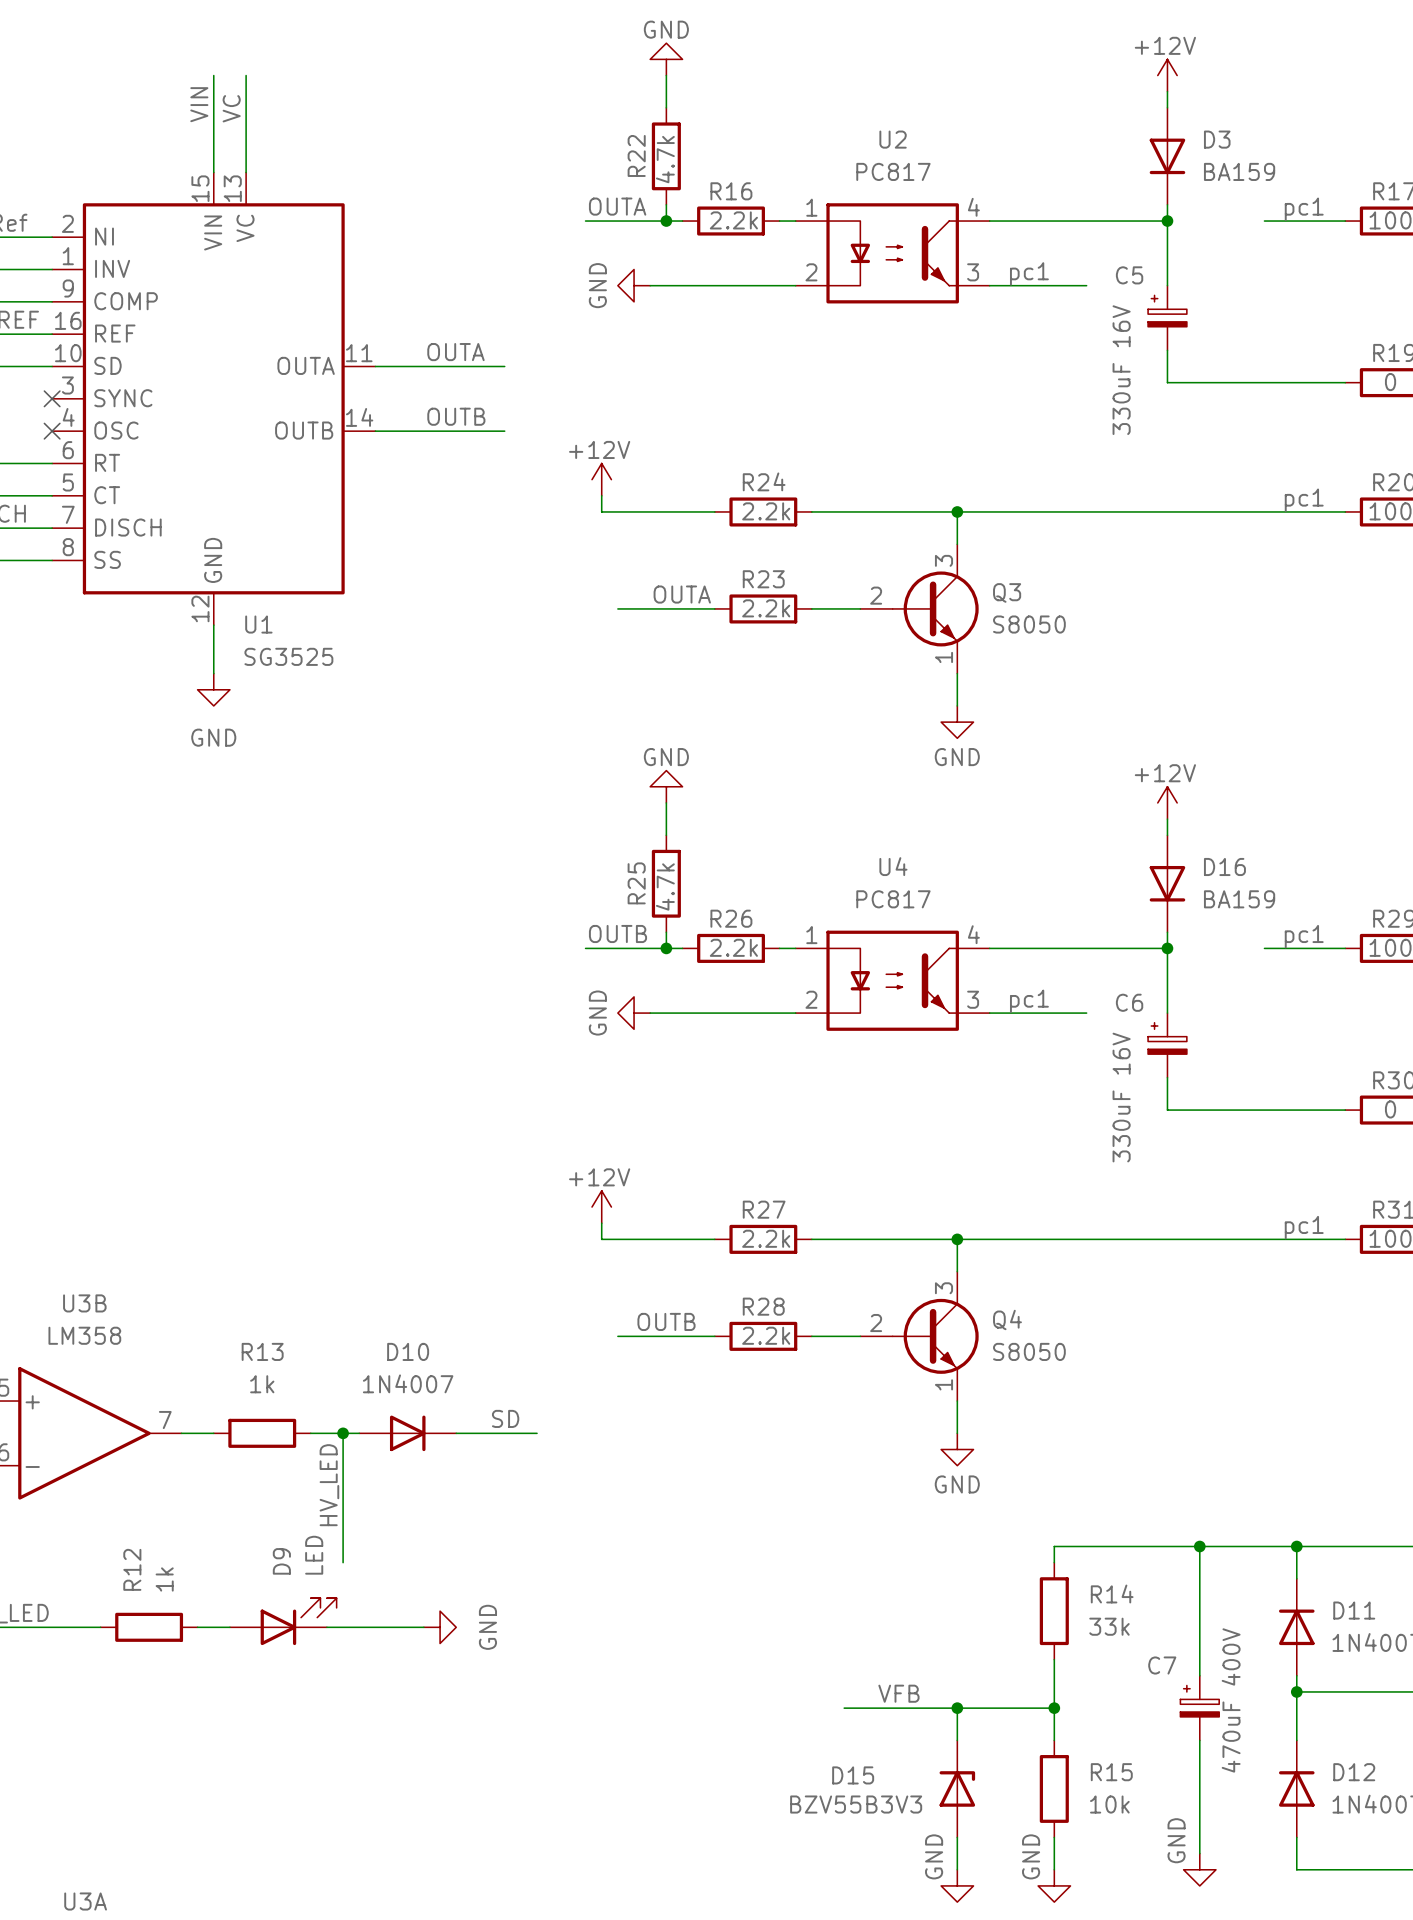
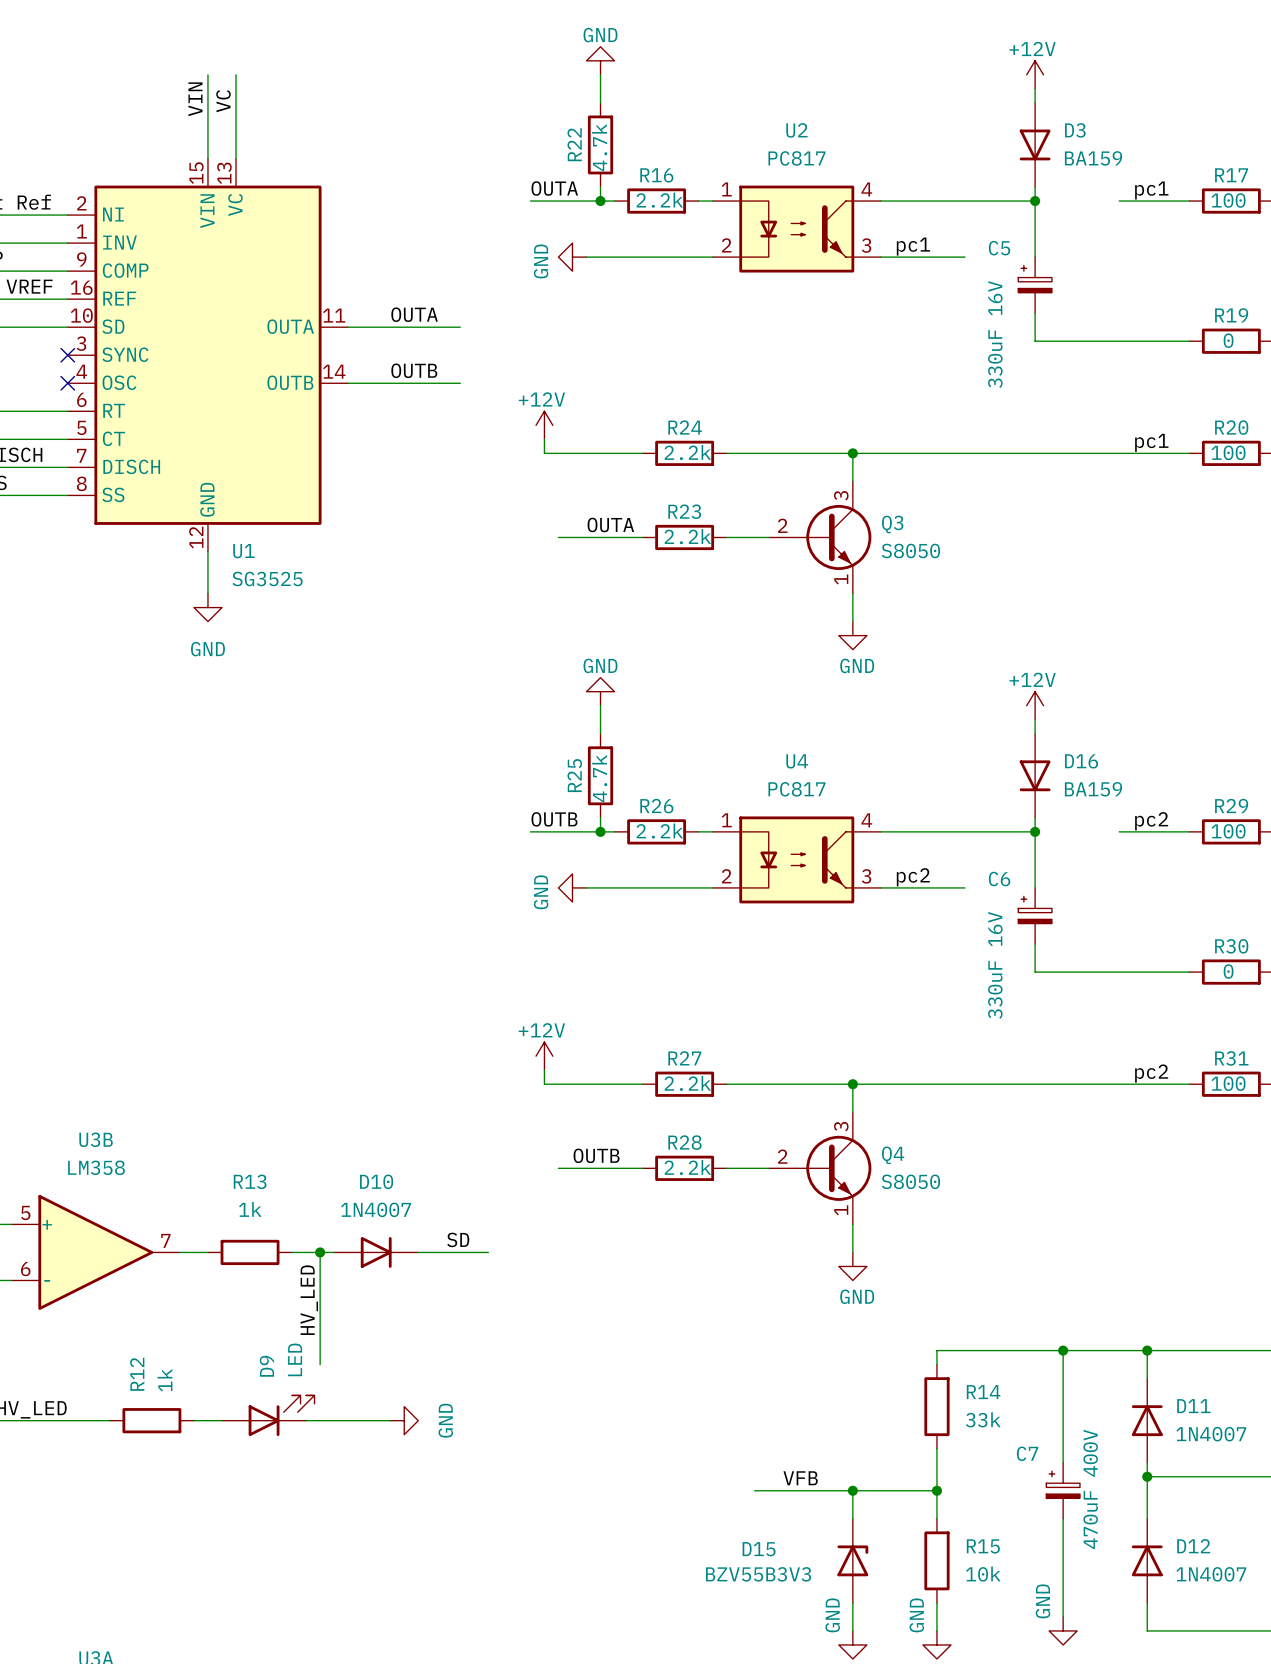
label: pc1 (1304, 936) -> pc2 (1151, 821)
label: pc1 (1029, 1001) -> pc2 (913, 877)
label: pc1 (1304, 1227) -> pc2 (1151, 1073)

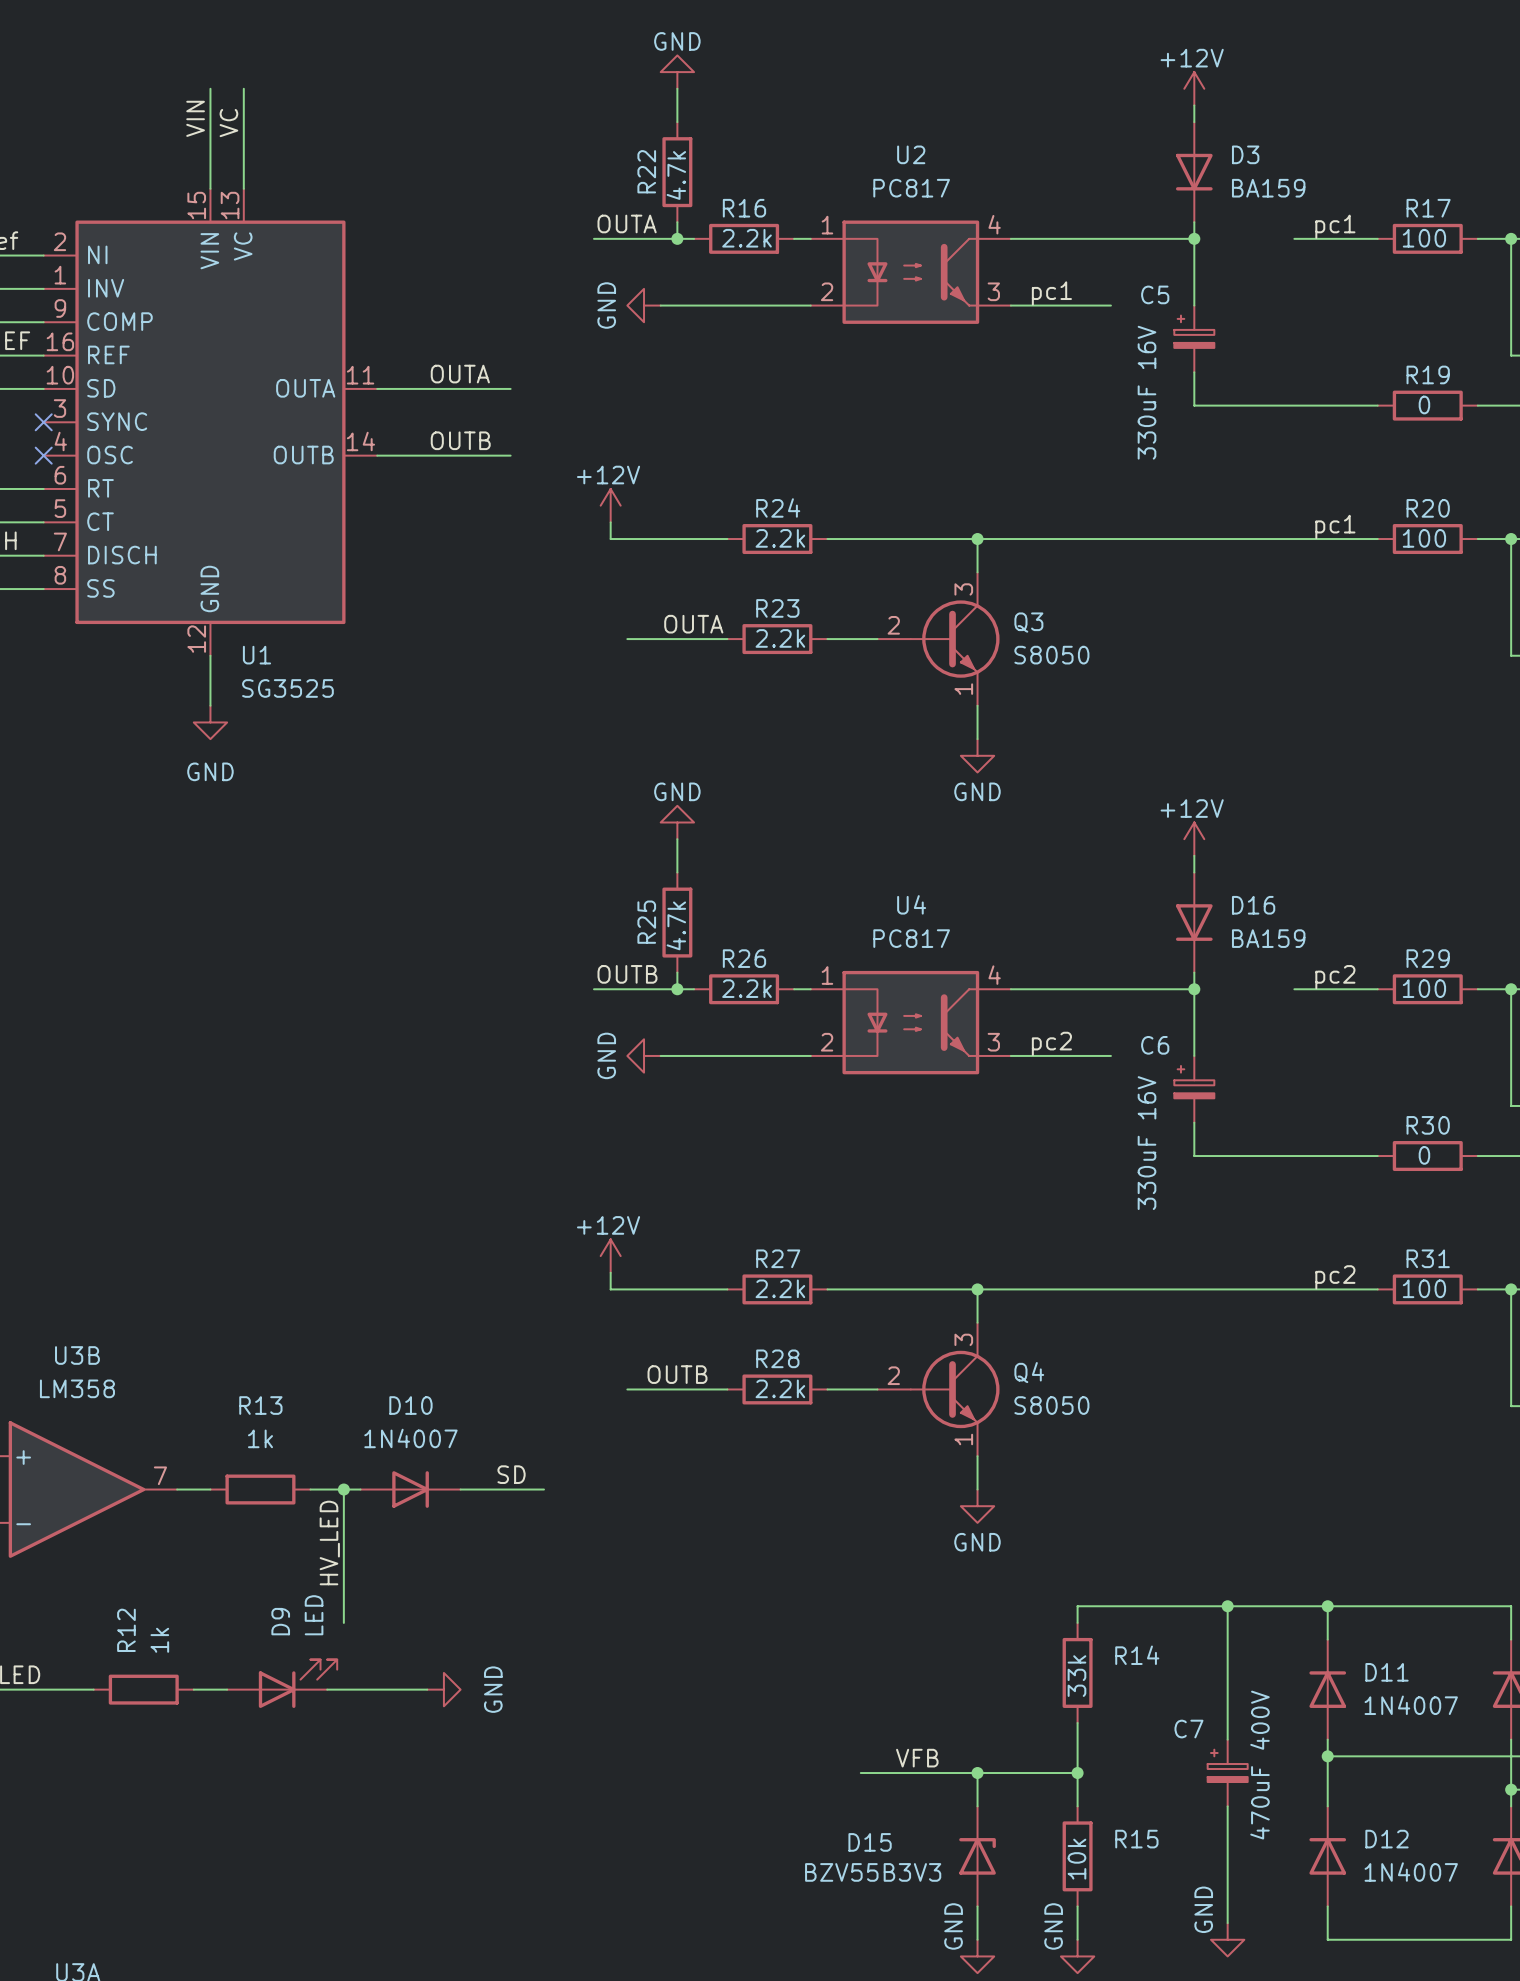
R14 value rotation: 0° (983, 1419) -> 90° counterclockwise (1076, 1676)
R14 value position: 33k (983, 1419) -> 33k (1076, 1676)
R15 value rotation: 0° (983, 1574) -> 90° counterclockwise (1076, 1859)
R15 value position: 10k (983, 1574) -> 10k (1076, 1859)

